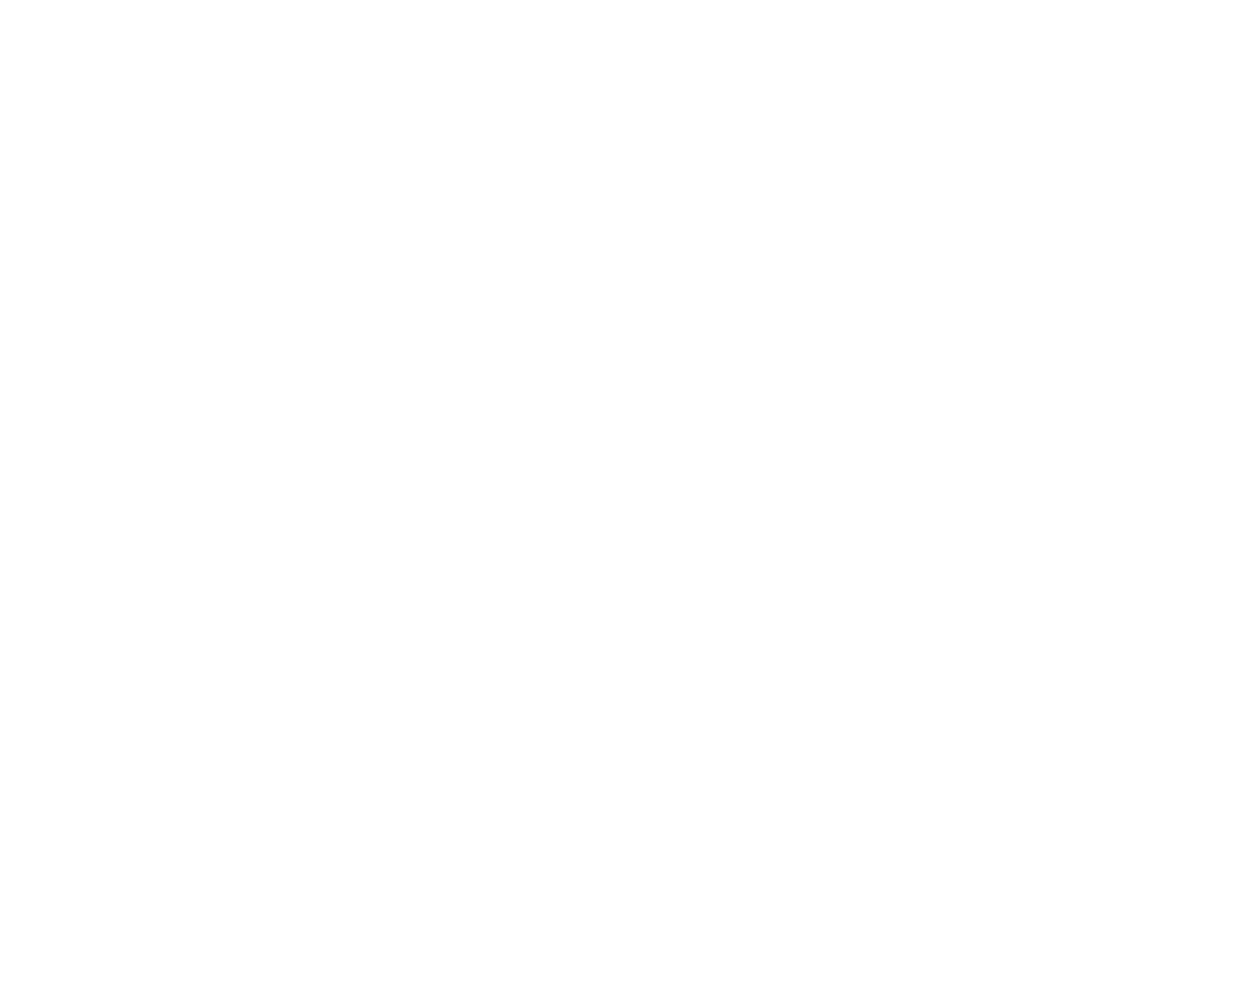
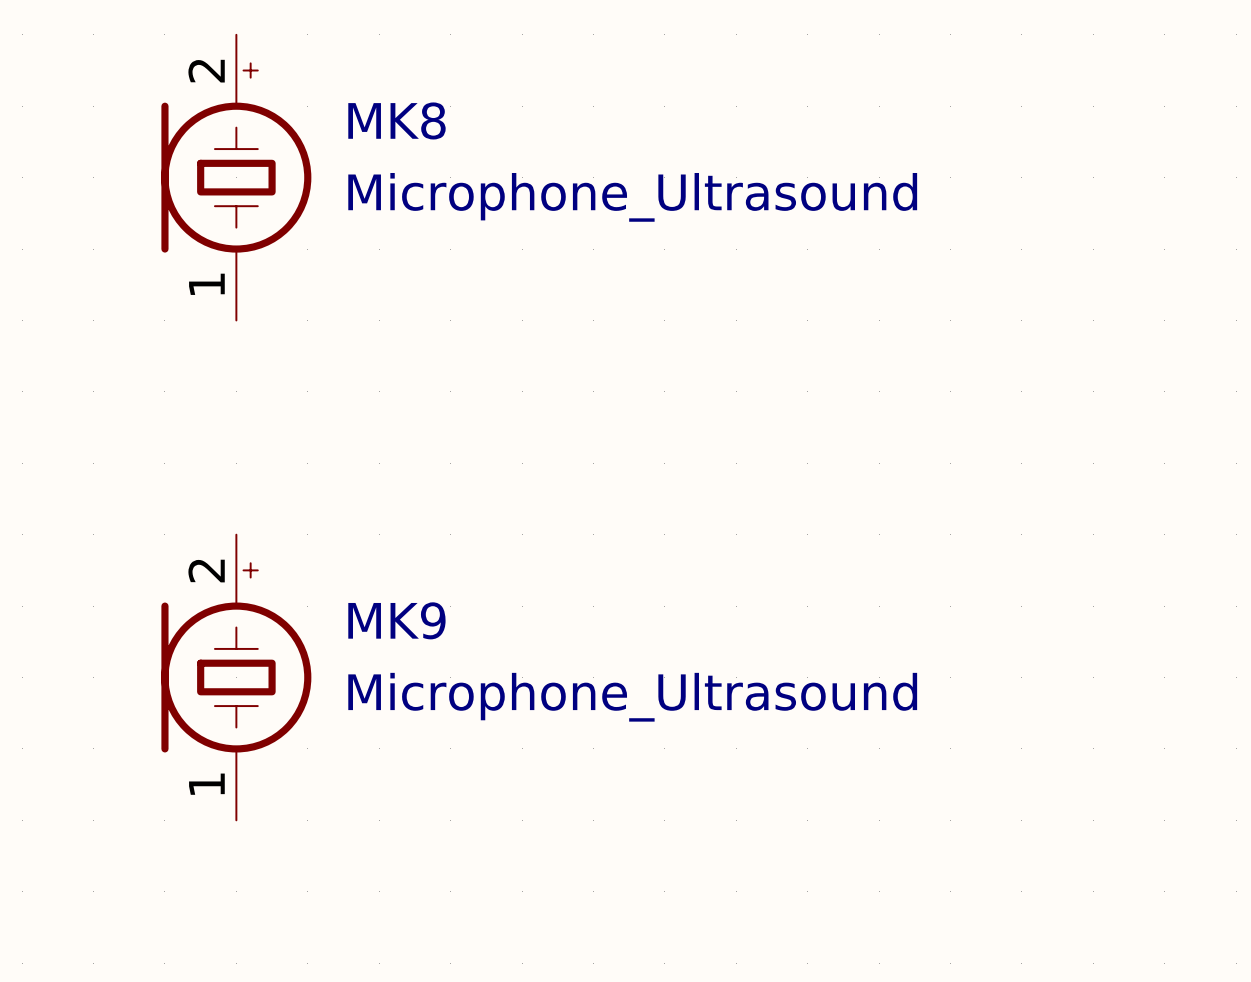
MK8: none -> Microphone_Ultrasound (236, 177)
MK9: none -> Microphone_Ultrasound (236, 677)

